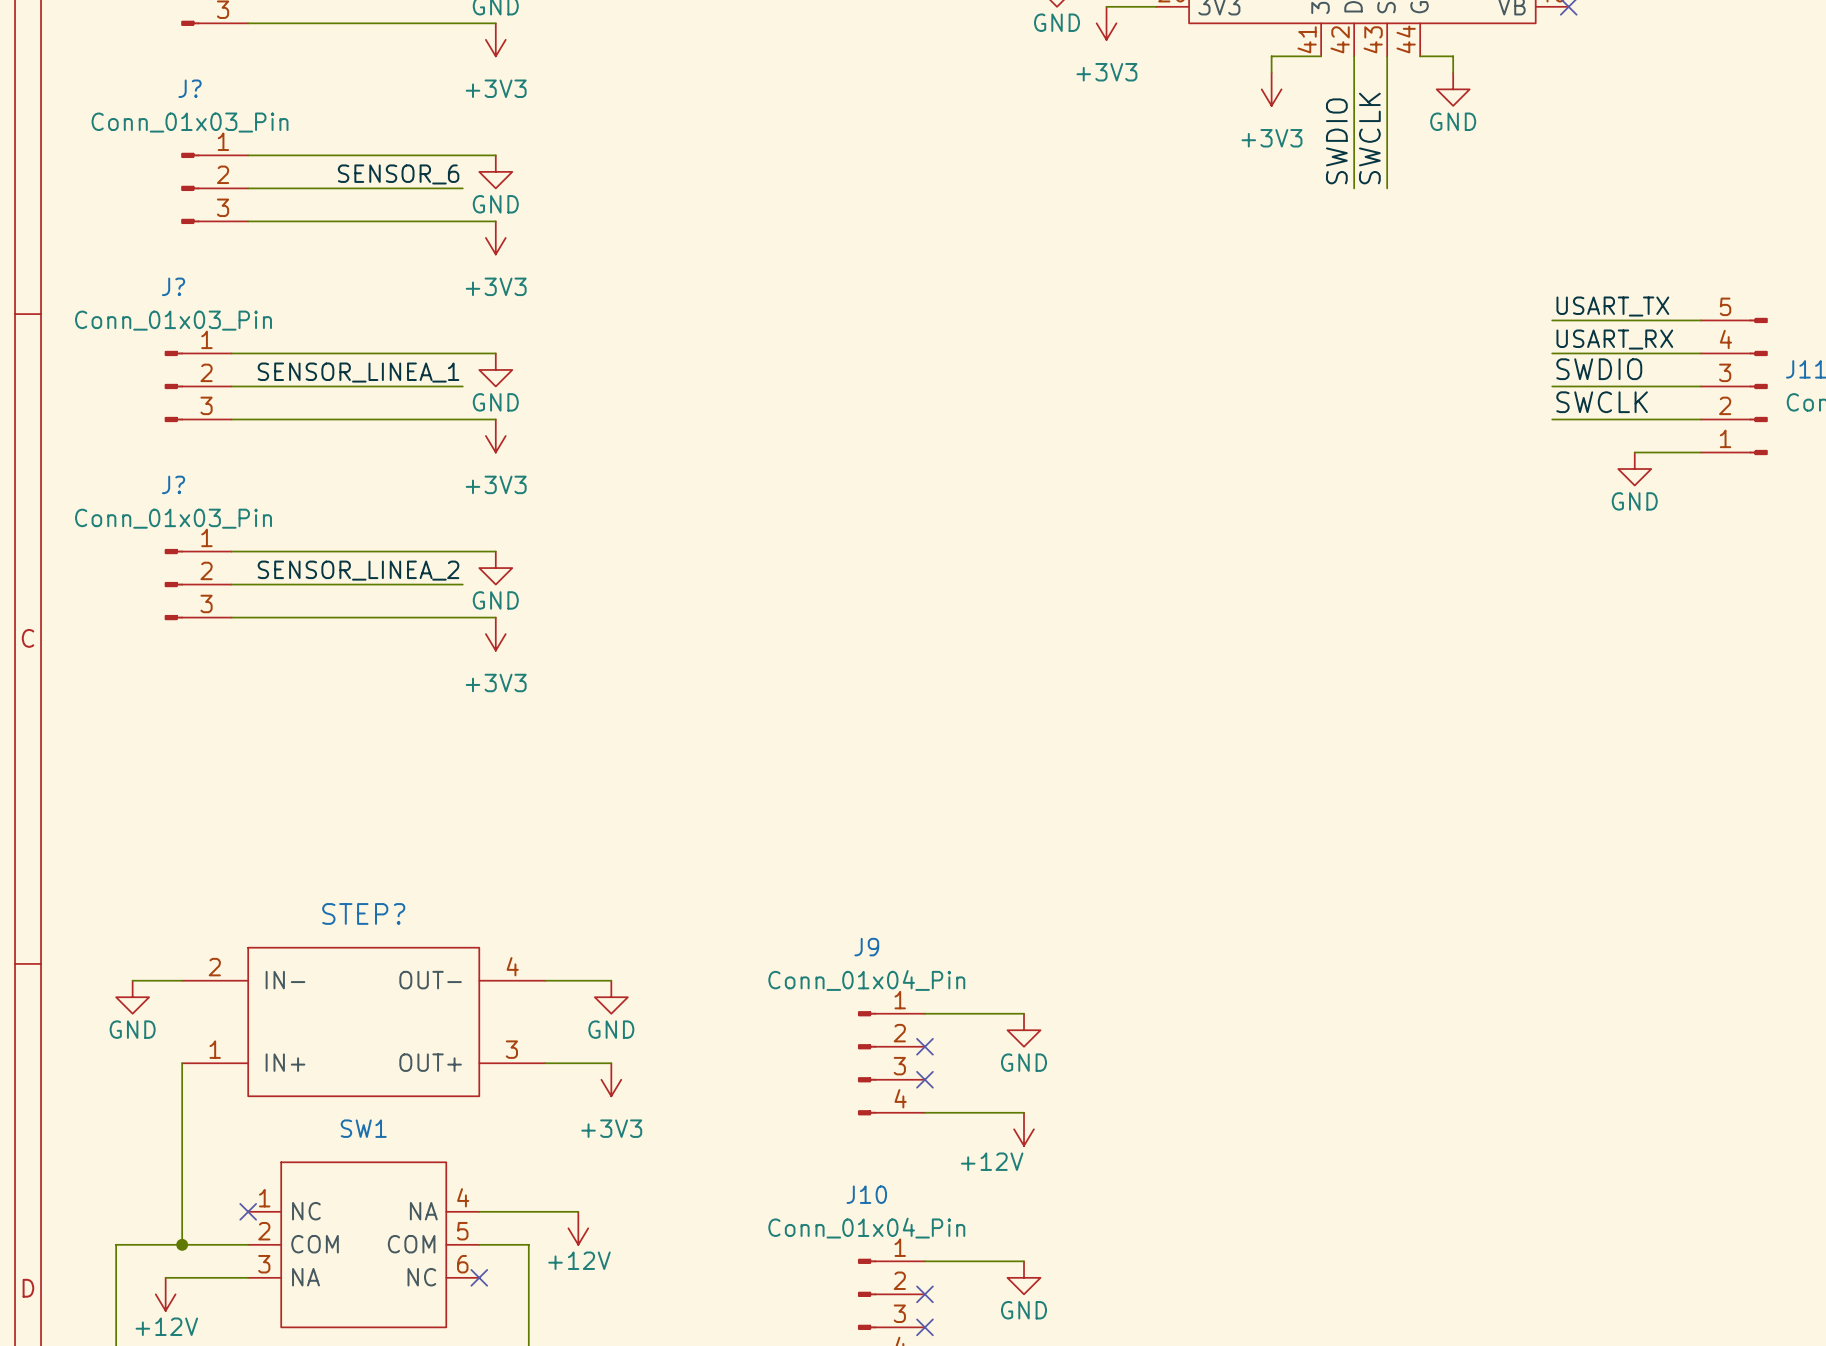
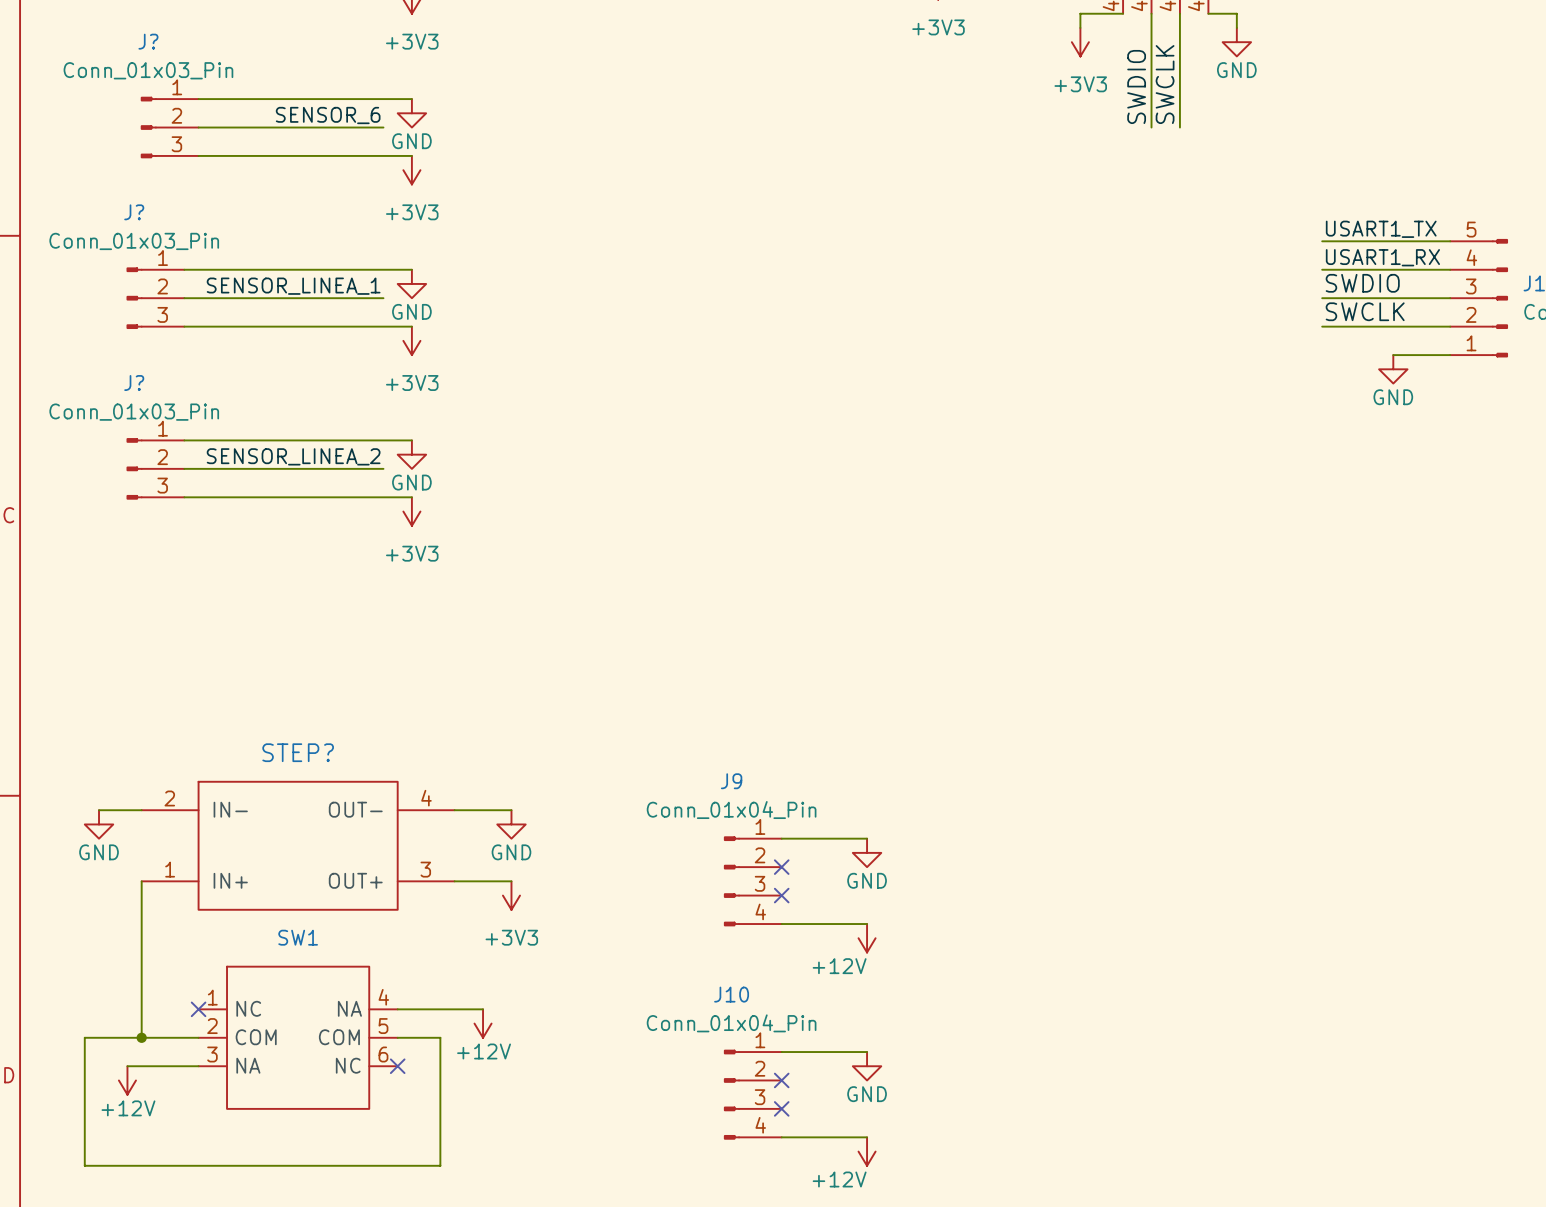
label: USART_TX (1612, 306) -> USART1_TX (1381, 229)
label: USART_RX (1614, 339) -> USART1_RX (1382, 257)

